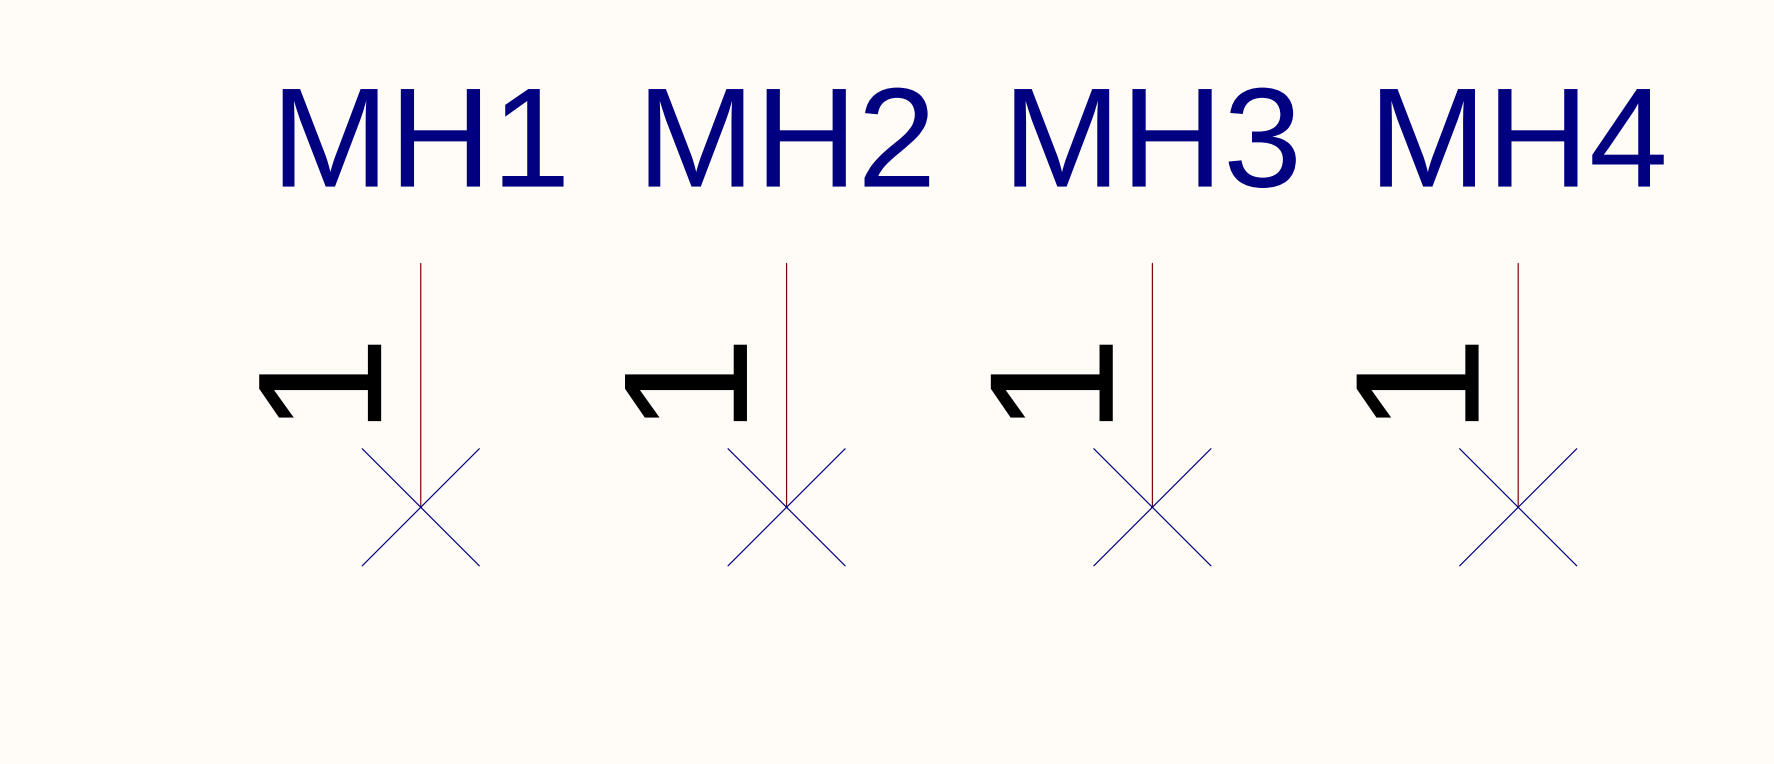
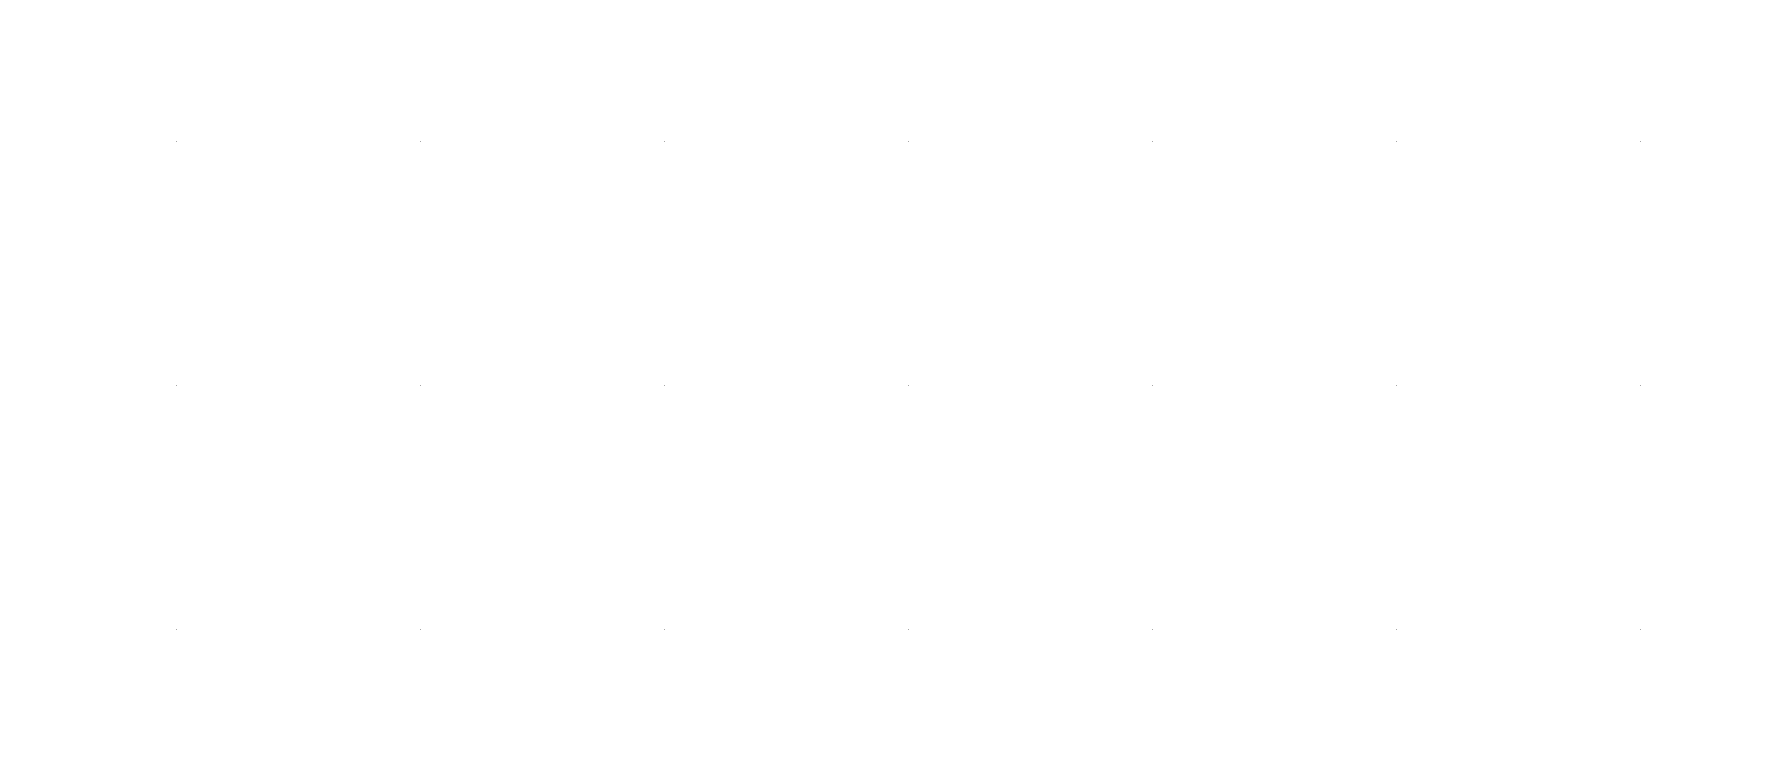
MH1: (420, 385) -> none
MH2: (786, 385) -> none
MH3: (1152, 385) -> none
MH4: (1518, 385) -> none
no-connect mark: (420, 507) -> none
no-connect mark: (786, 507) -> none
no-connect mark: (1152, 507) -> none
no-connect mark: (1518, 507) -> none

